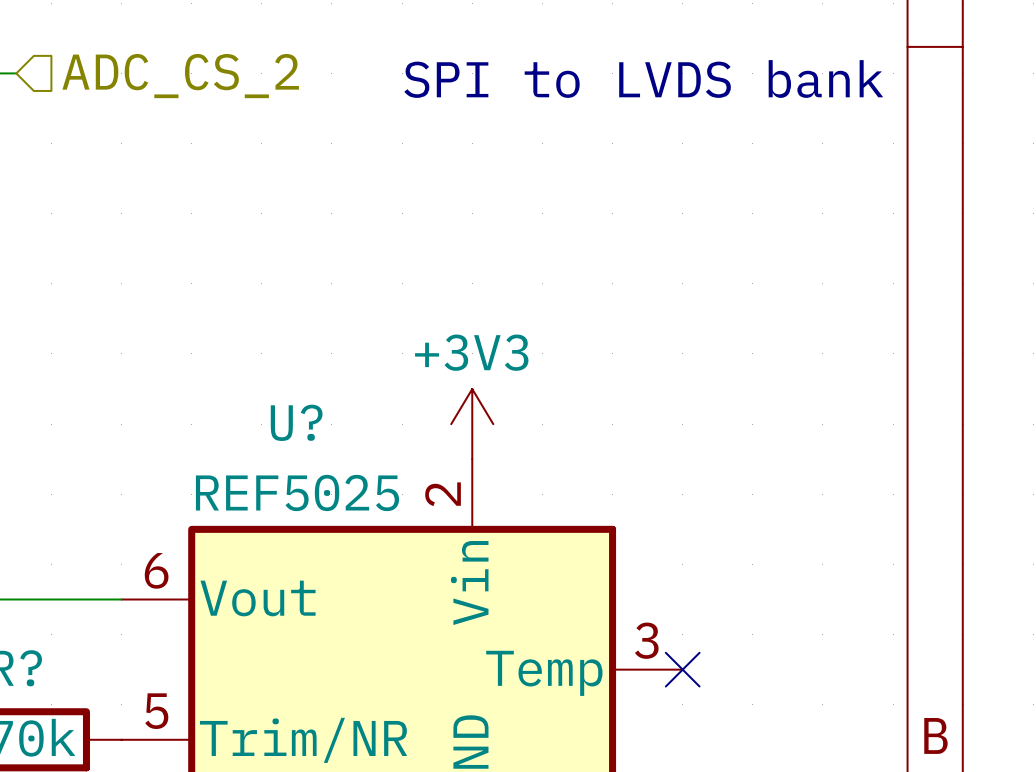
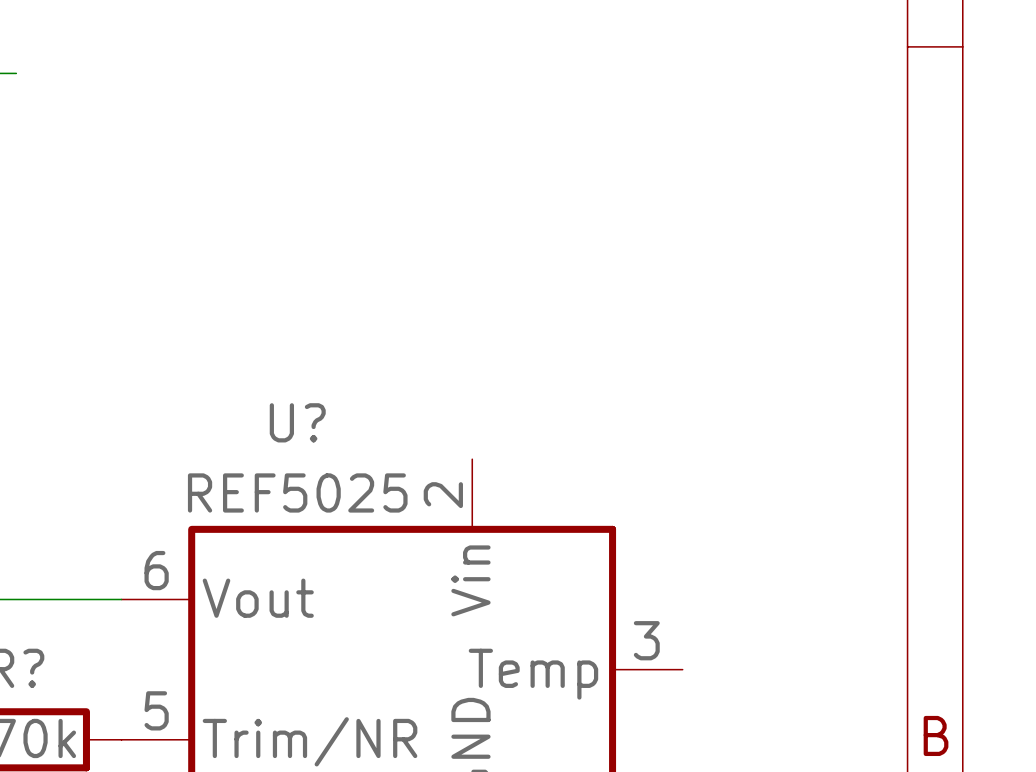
hierarchical label: ADC_CS_2 (180, 76) -> none
text: SPI to LVDS bank (643, 79) -> none
power symbol: +3V3 (472, 424) -> none
no-connect mark: (682, 669) -> none

